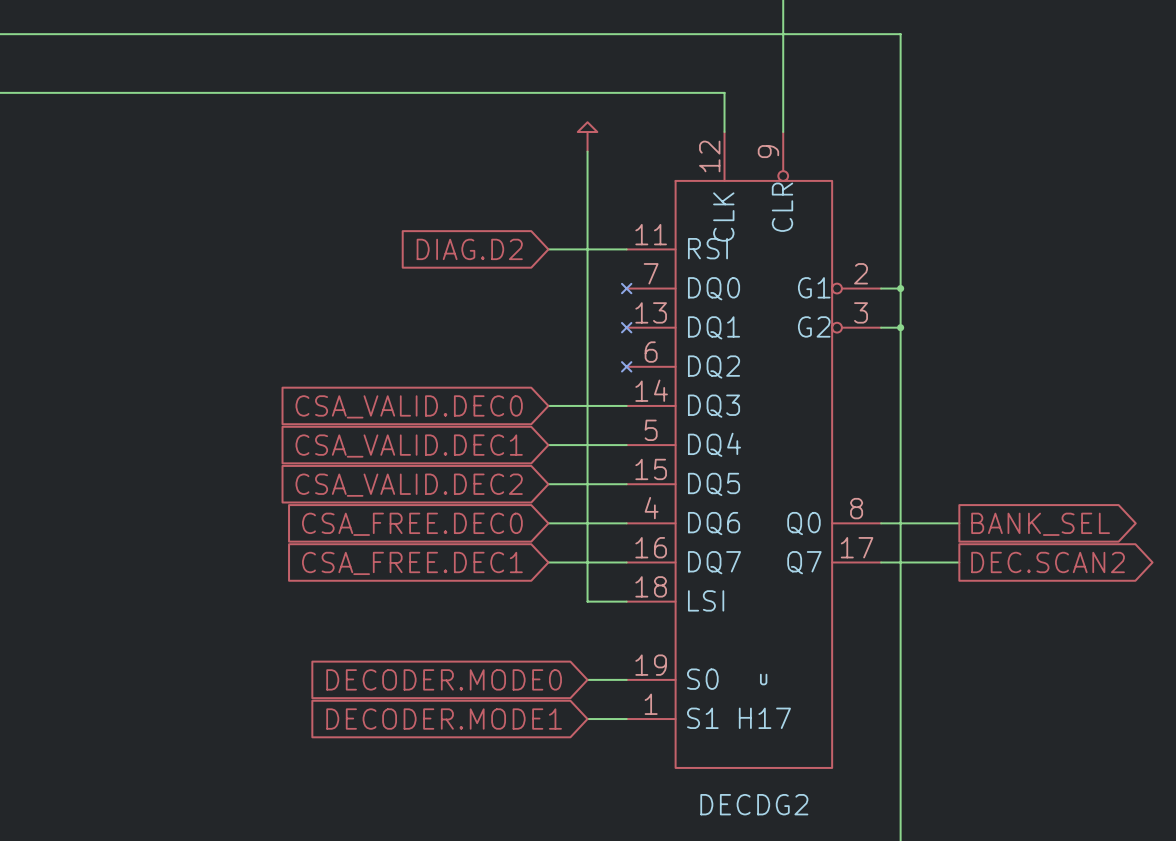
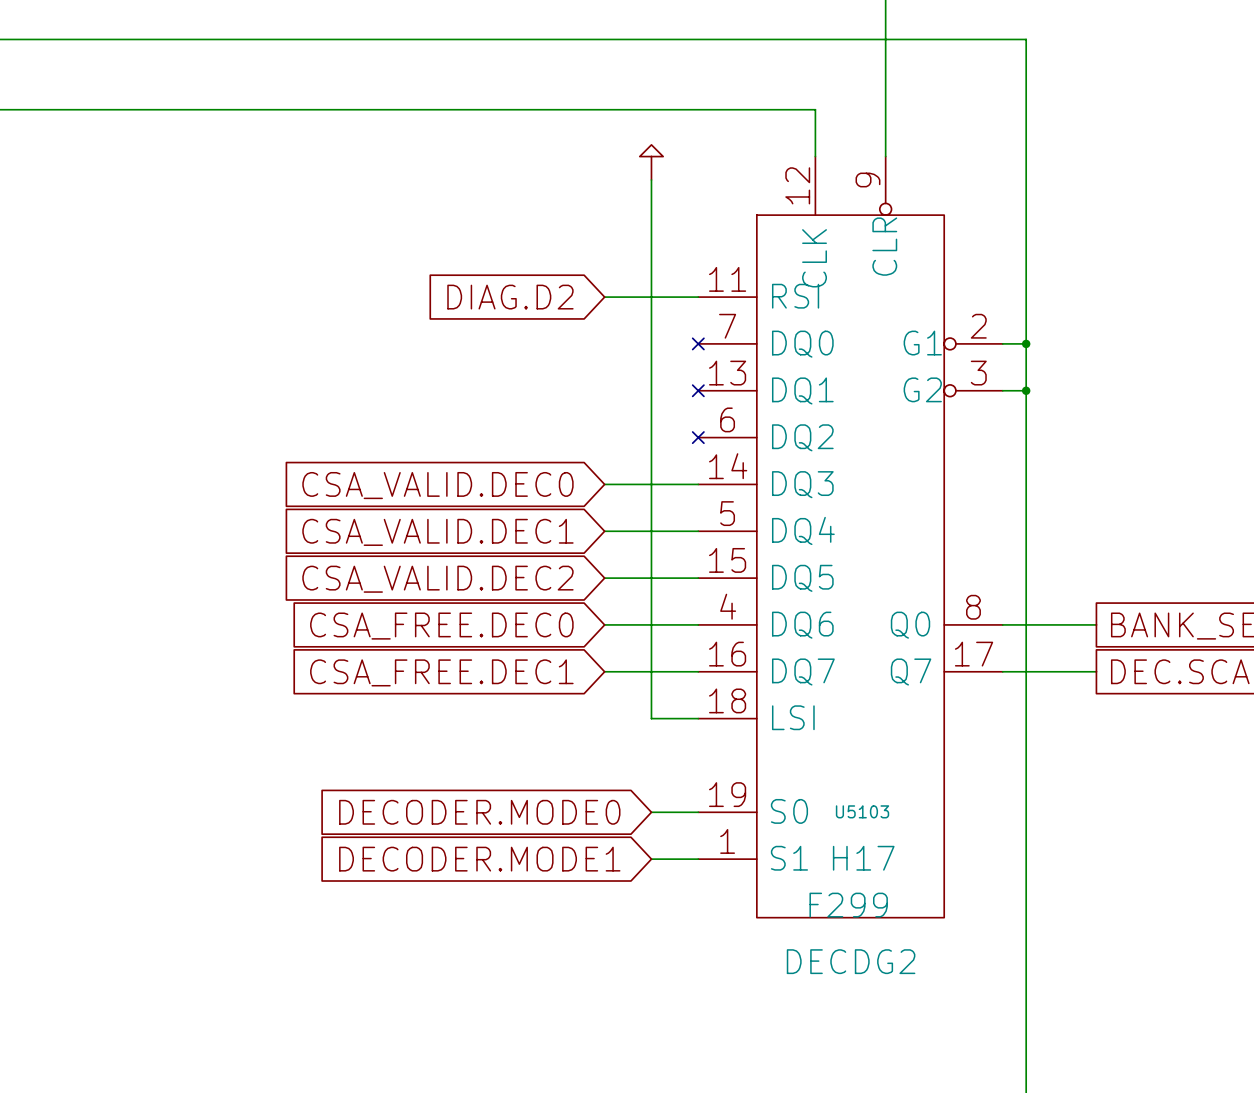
U name: U (763, 679) -> U5103 (862, 811)
U value: none -> F299 (848, 905)

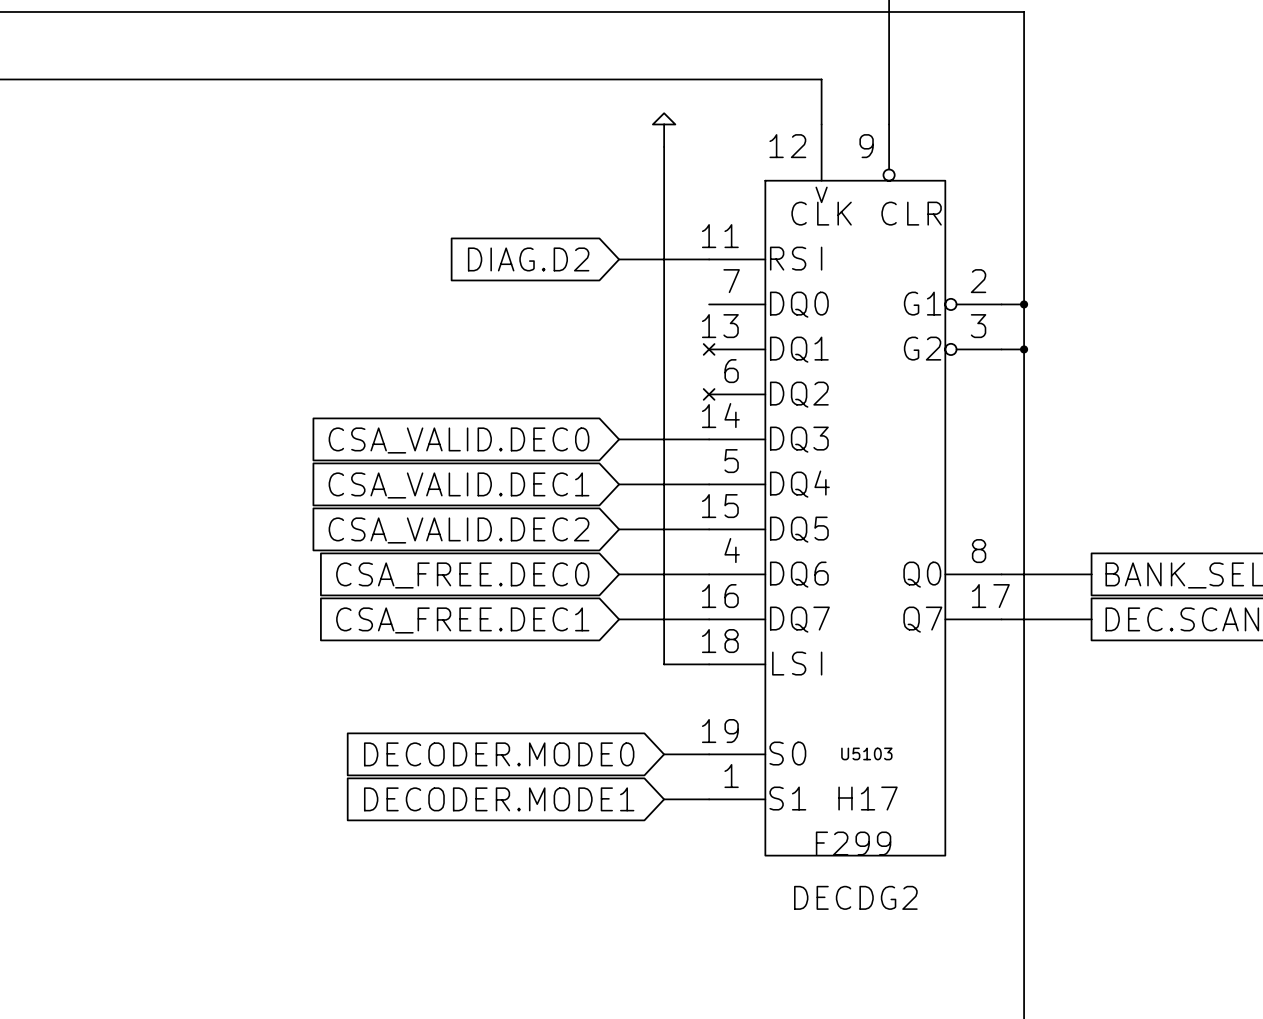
U5103 symbol: [698, 156, 1003, 918] -> [709, 124, 1002, 856]
no-connect mark: (698, 343) -> none

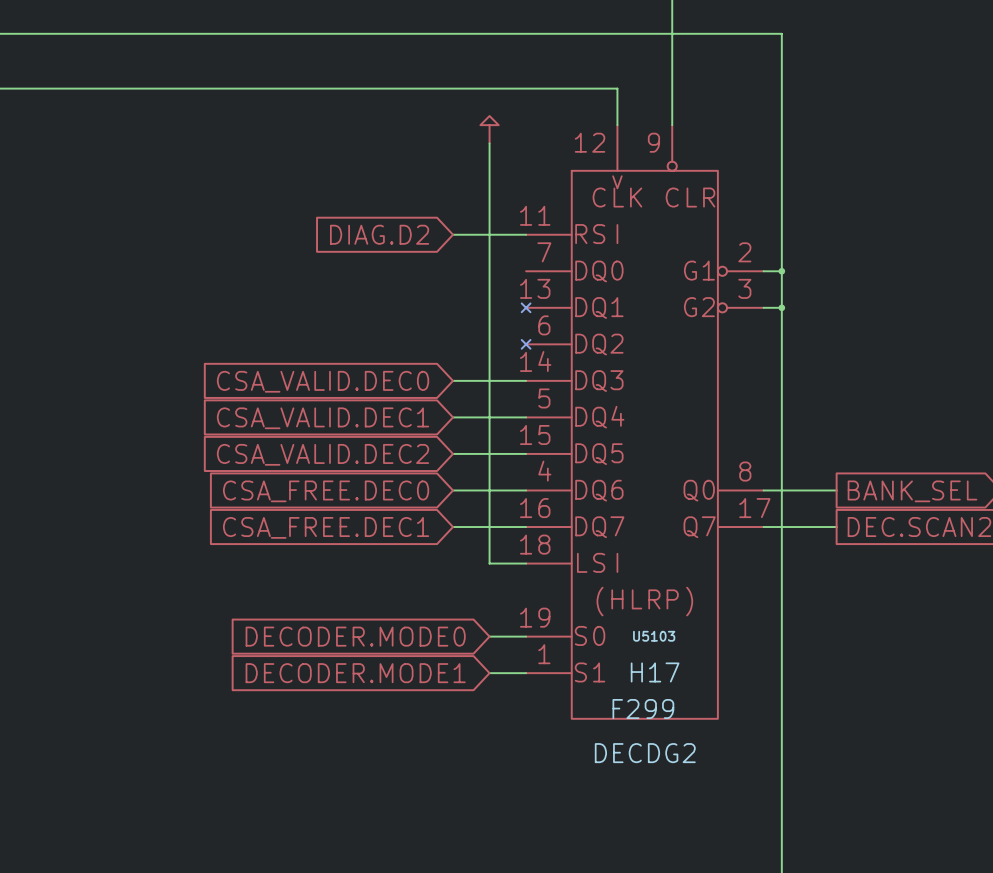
U5103 text: none -> H (617, 599)
U5103 text: none -> L (637, 599)
U5103 text: none -> R (654, 599)
U5103 text: none -> P (672, 599)
U5103 text: none -> ( (600, 601)
U5103 text: none -> ) (689, 601)

